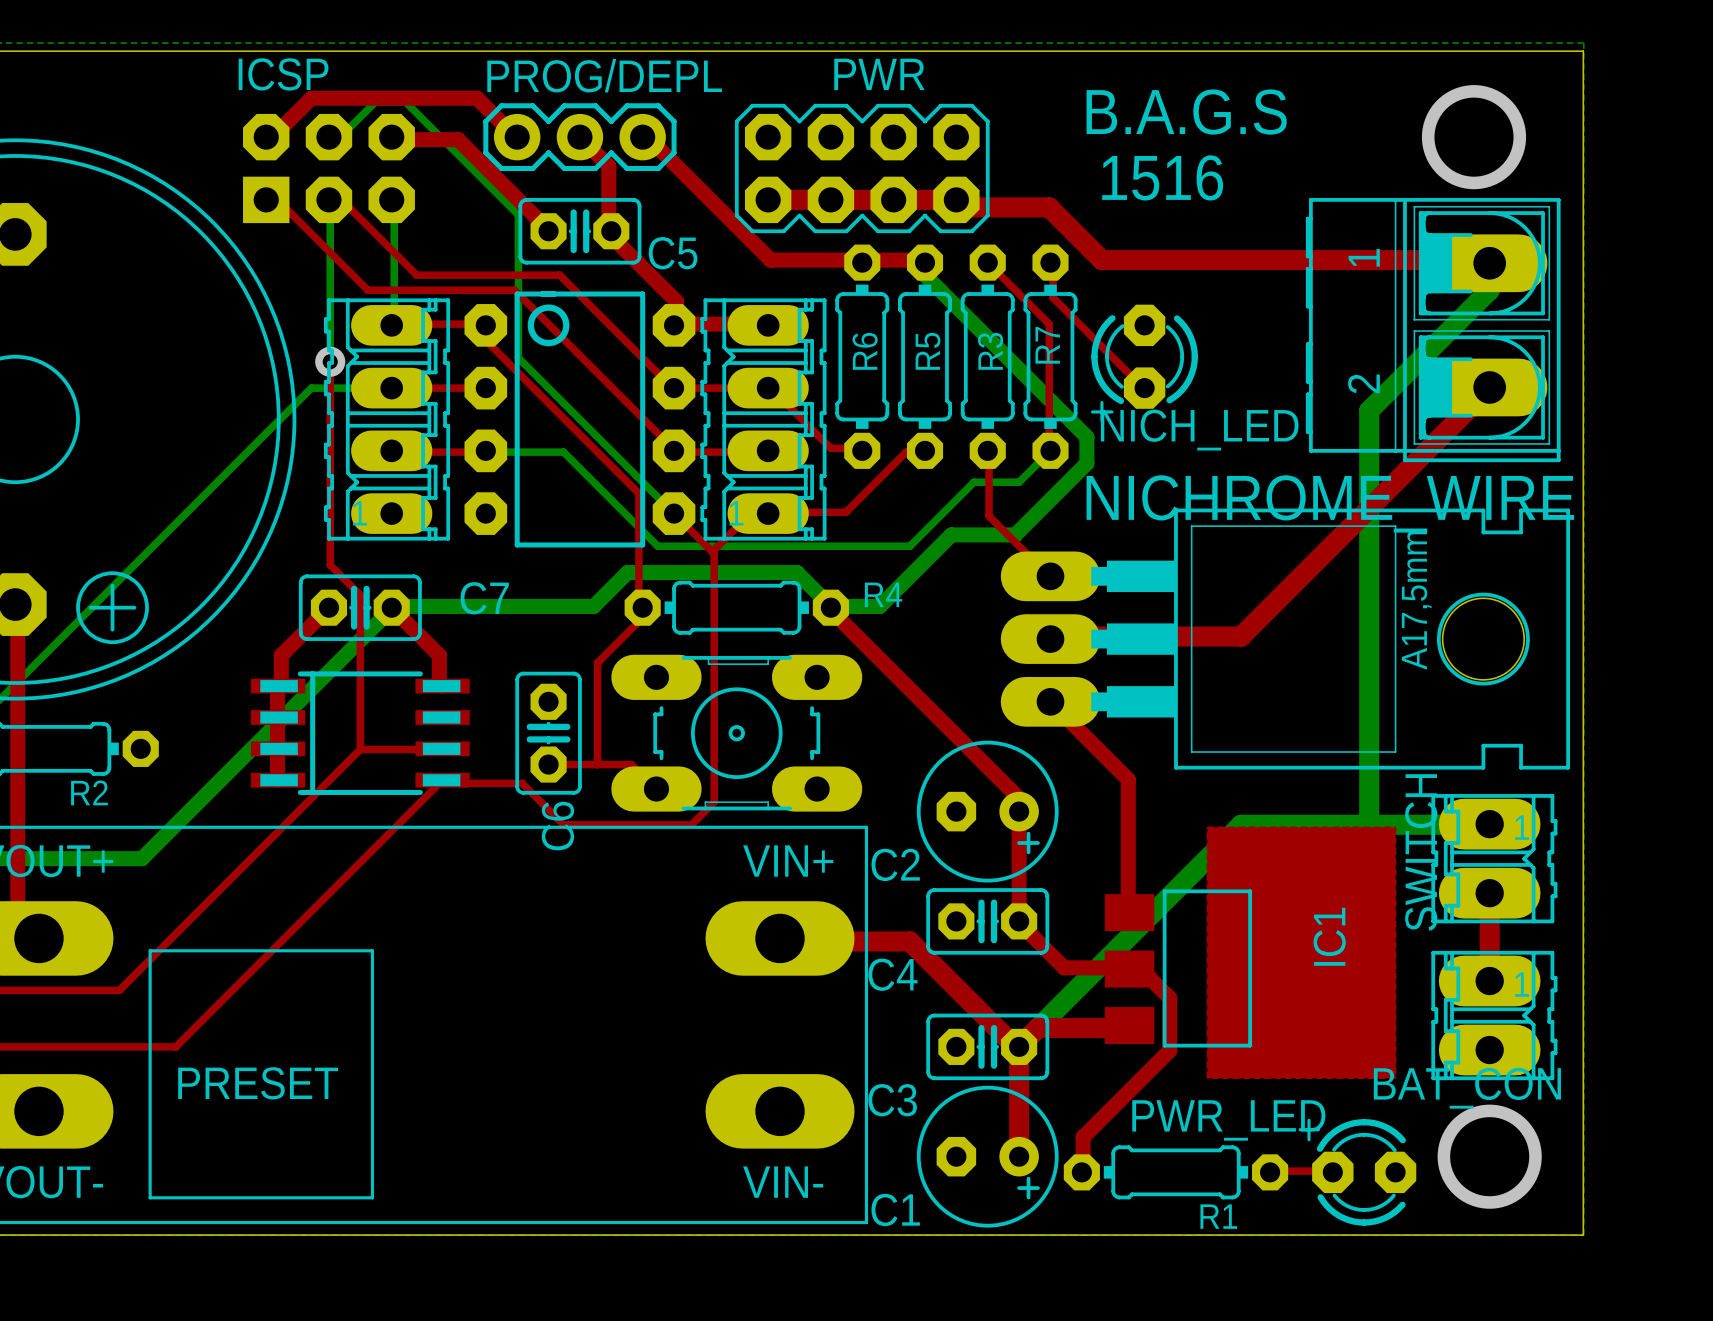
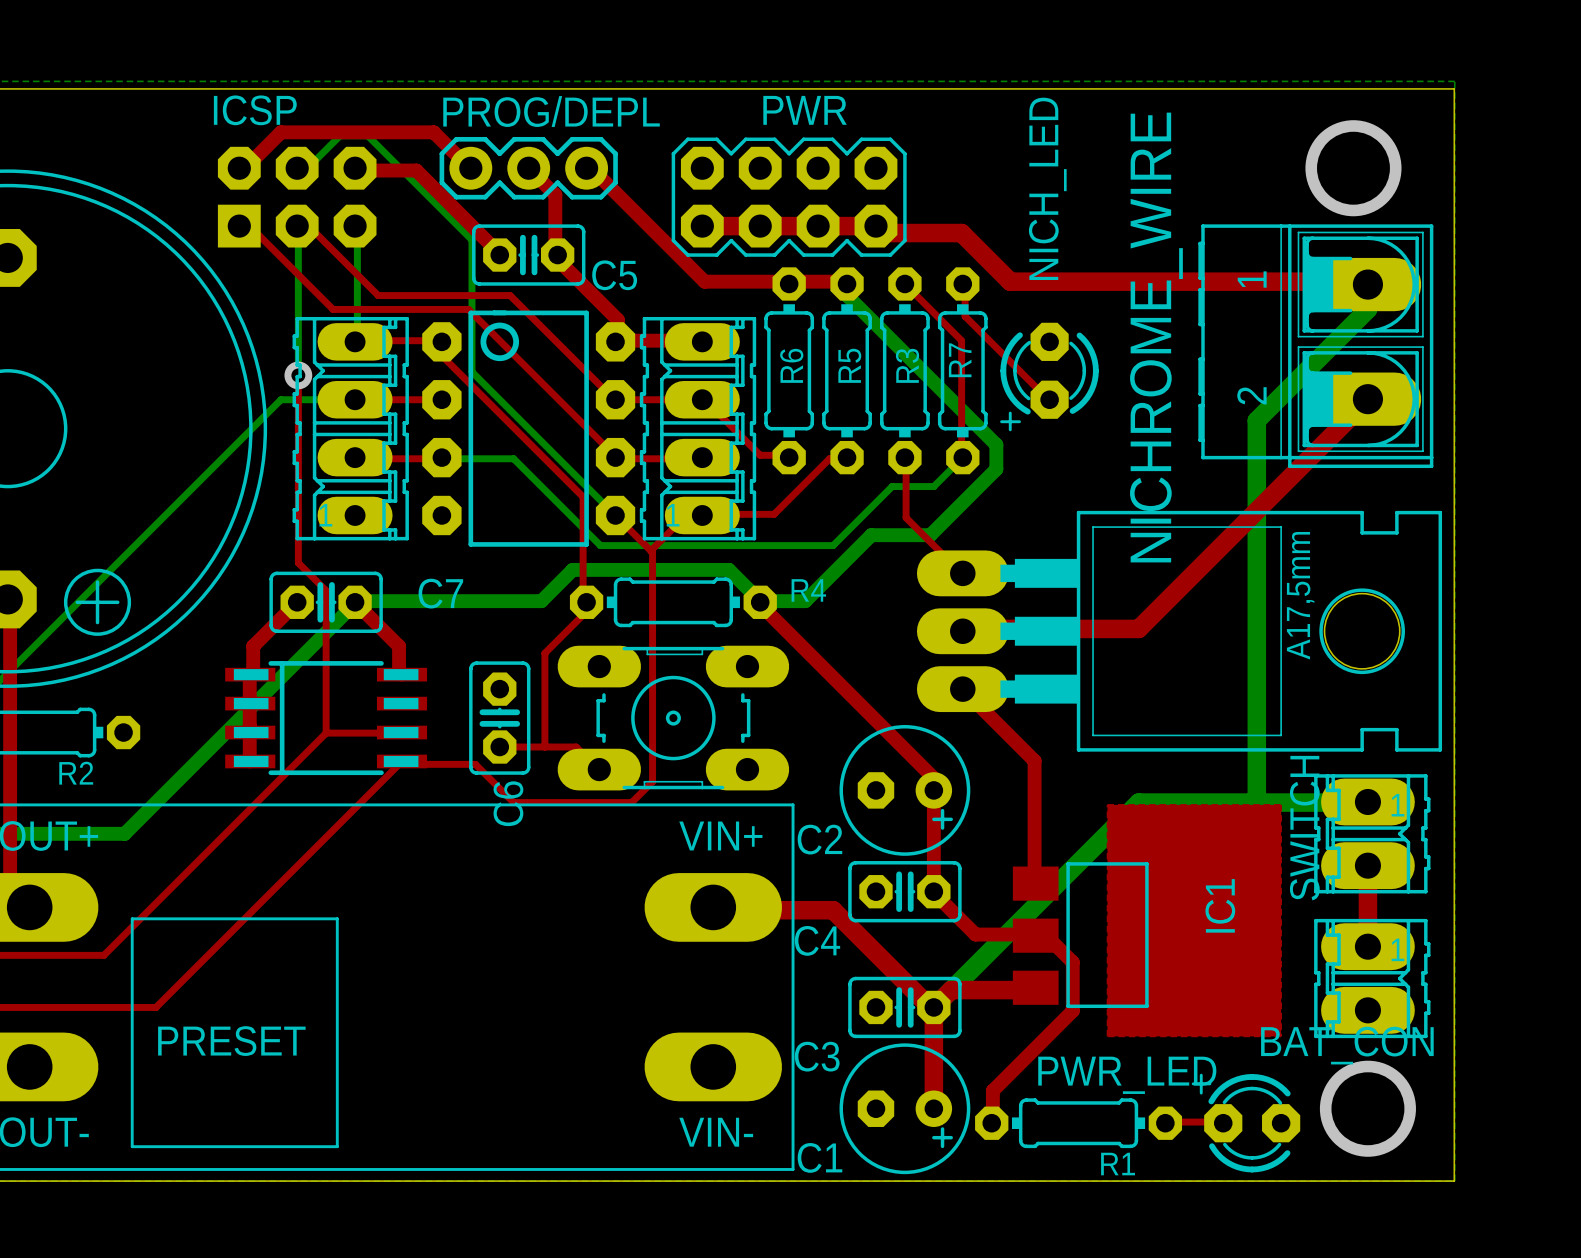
text: B.A.G.S (1186, 112) -> none
text: 1516 (1162, 177) -> none
NICH_LED name rotation: 0° (1199, 430) -> 90° counterclockwise (1047, 188)
NICH_LED name position: NICH_LED (1199, 430) -> NICH_LED (1047, 188)
NICHROME_WIRE name rotation: 0° (1330, 503) -> 90° counterclockwise (1156, 337)

